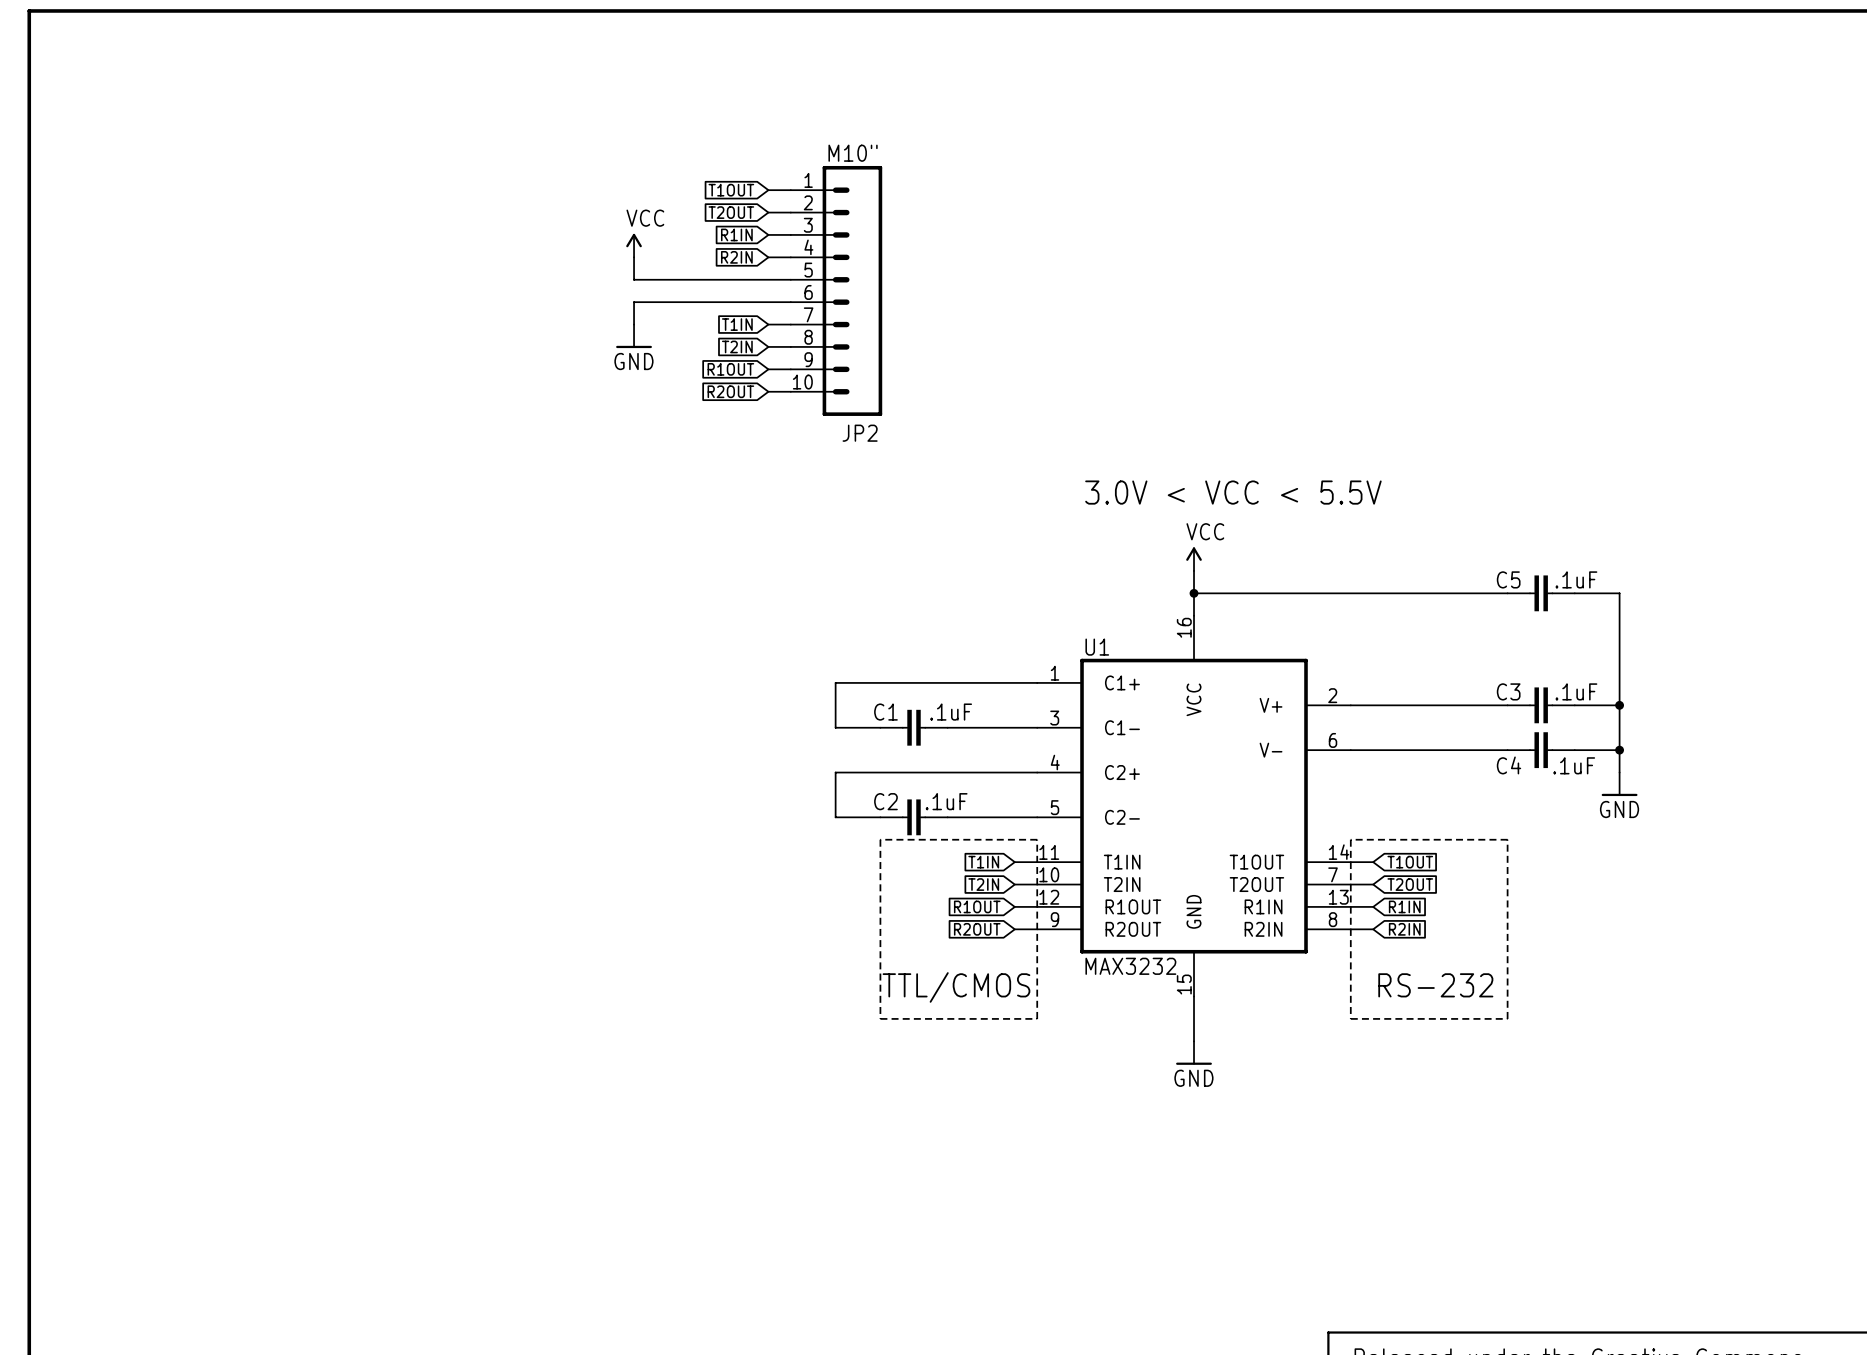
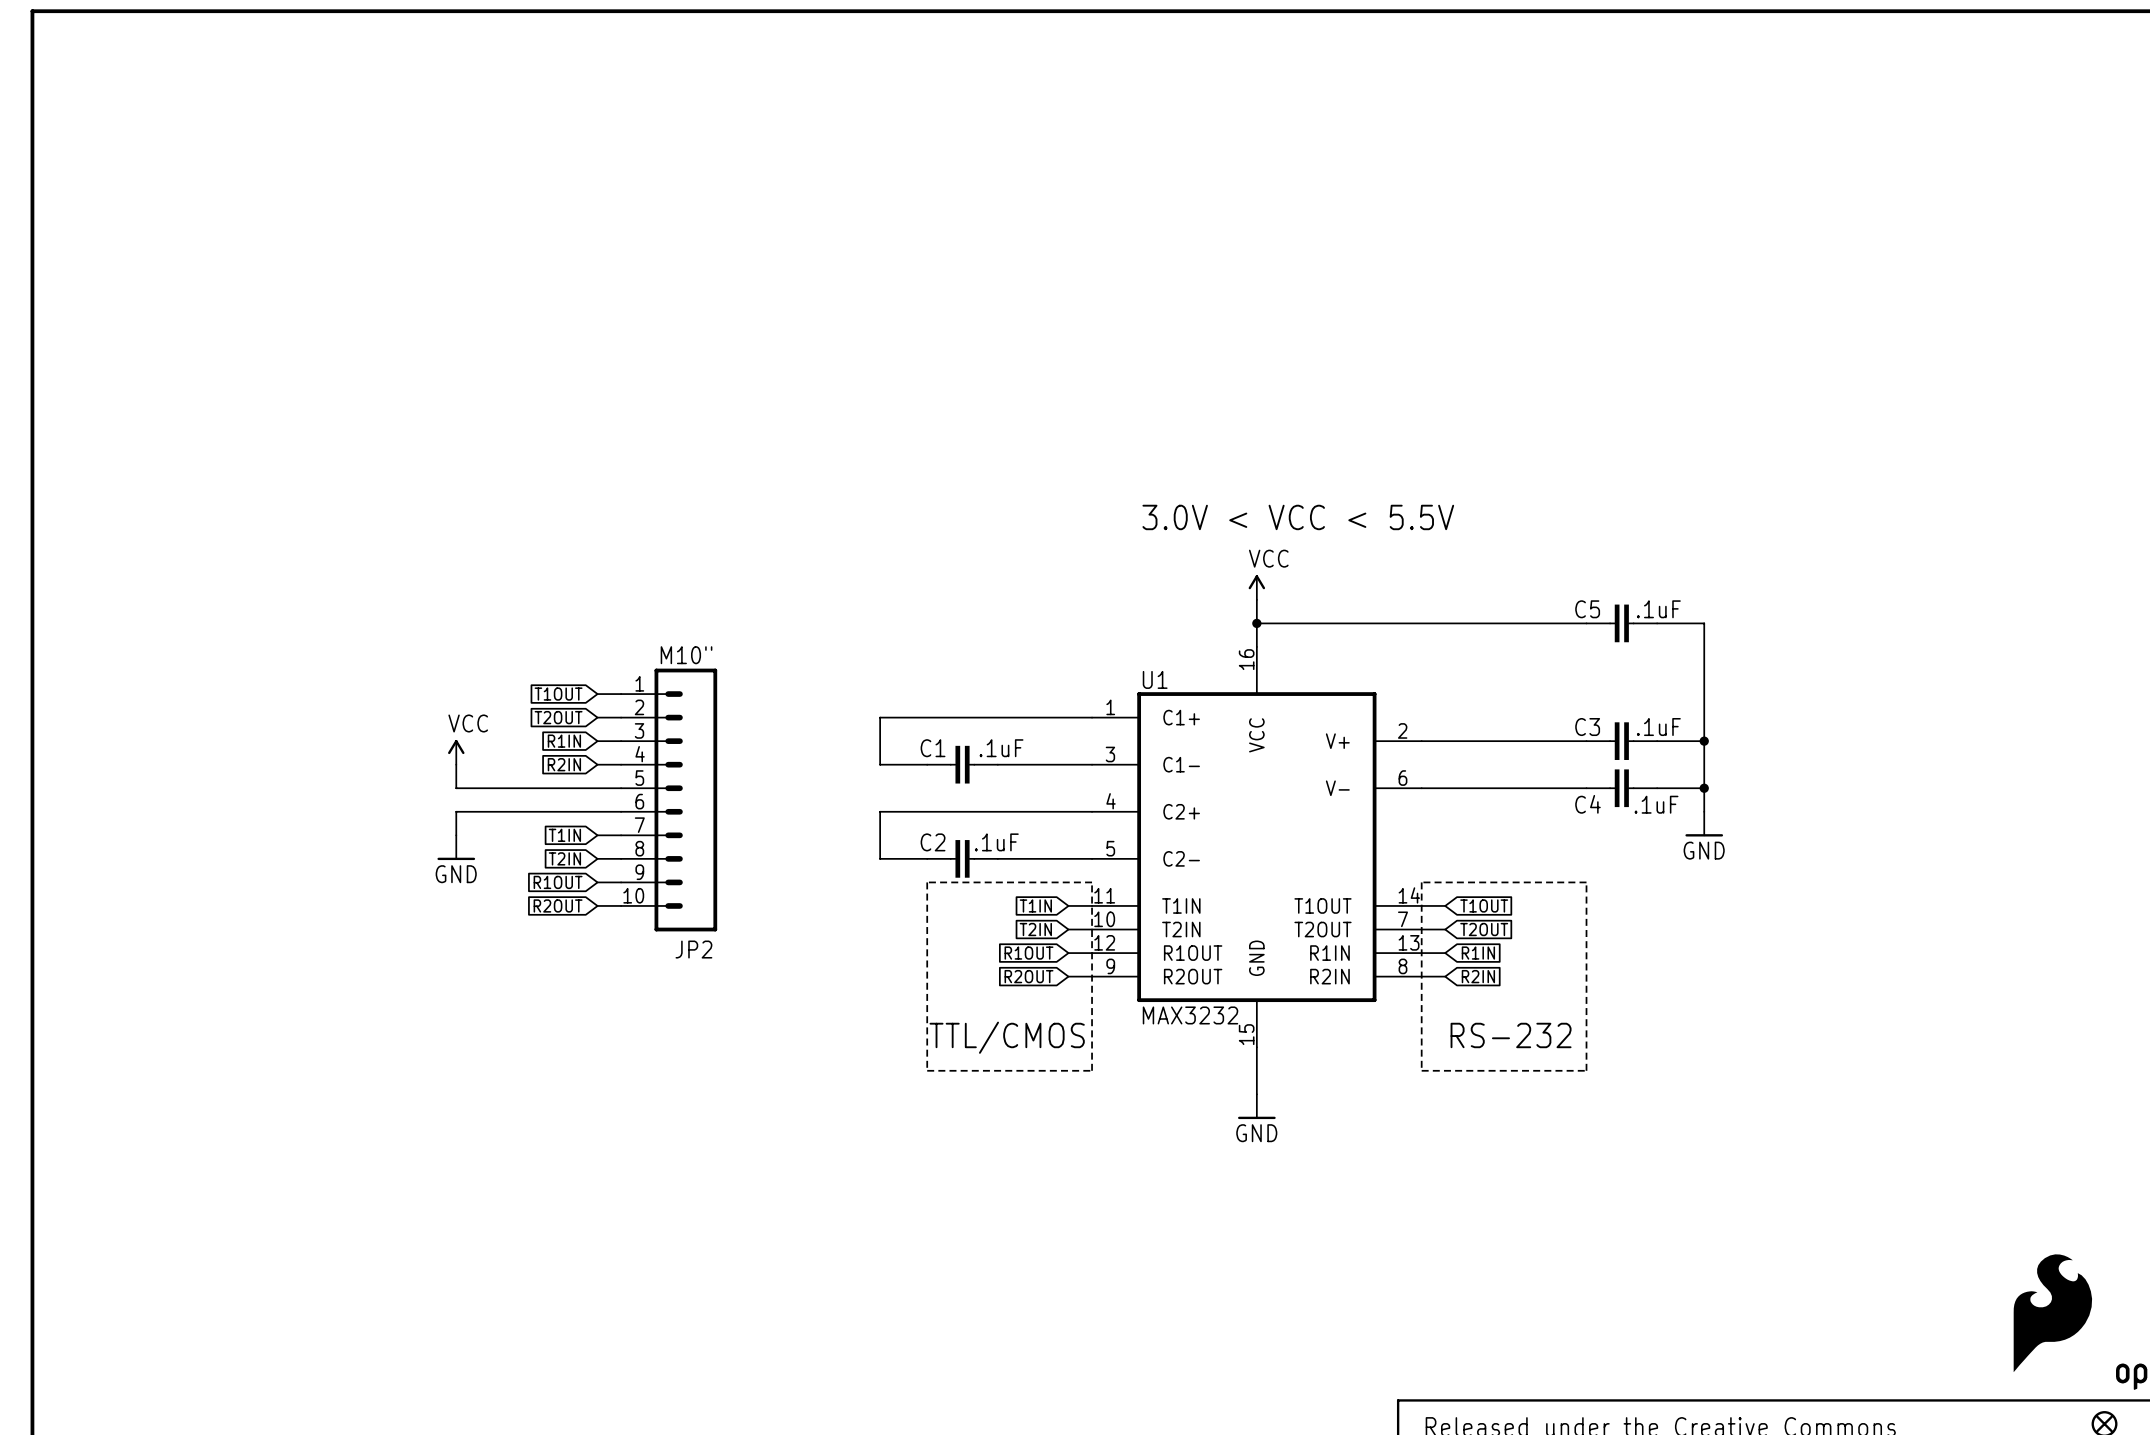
global label: T1OUT (731, 190) -> none
wire: (768, 190) (790, 190) -> none
global label: T2OUT (731, 212) -> none
wire: (768, 212) (790, 212) -> none
global label: R1IN (736, 234) -> none
wire: (768, 234) (790, 234) -> none
power symbol: VCC (634, 245) -> none
wire: (634, 257) (634, 279) (790, 279) -> none
global label: R2IN (736, 257) -> none
wire: (768, 257) (790, 257) -> none
JP2 position: (836, 290) -> (669, 800)
wire: (790, 302) (634, 302) (634, 324) -> none
global label: T1IN (737, 324) -> none
wire: (768, 324) (790, 324) -> none
power symbol: GND (634, 336) -> none
global label: T2IN (737, 346) -> none
wire: (768, 346) (790, 346) -> none
global label: R1OUT (730, 369) -> none
wire: (768, 369) (790, 369) -> none
global label: R2OUT (730, 391) -> none
wire: (768, 391) (790, 391) -> none
global label: none -> T1OUT (558, 694)
wire: none -> (597, 694) (621, 694)
global label: none -> T2OUT (558, 717)
wire: none -> (597, 717) (621, 717)
global label: none -> R1IN (564, 741)
wire: none -> (597, 741) (621, 741)
power symbol: none -> VCC (456, 752)
wire: none -> (456, 764) (456, 788) (621, 788)
global label: none -> R2IN (564, 764)
wire: none -> (597, 764) (621, 764)
wire: none -> (621, 811) (456, 811) (456, 835)
global label: none -> T1IN (564, 835)
wire: none -> (597, 835) (621, 835)
power symbol: none -> GND (456, 847)
global label: none -> T2IN (564, 858)
wire: none -> (597, 858) (621, 858)
global label: none -> R1OUT (558, 882)
wire: none -> (597, 882) (621, 882)
global label: none -> R2OUT (558, 905)
wire: none -> (597, 905) (621, 905)

